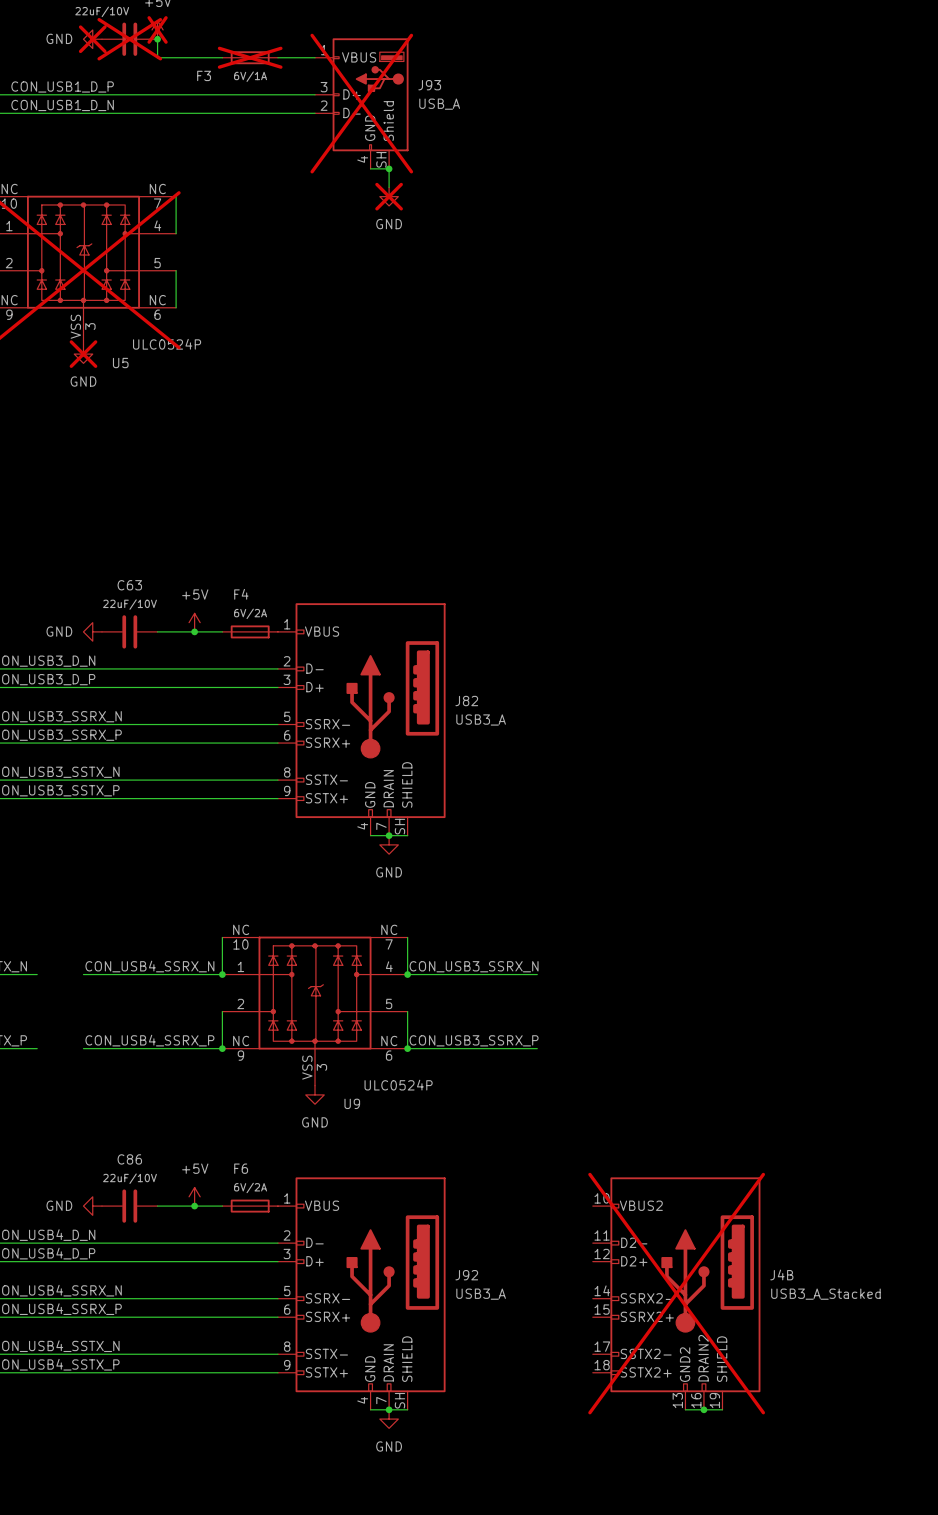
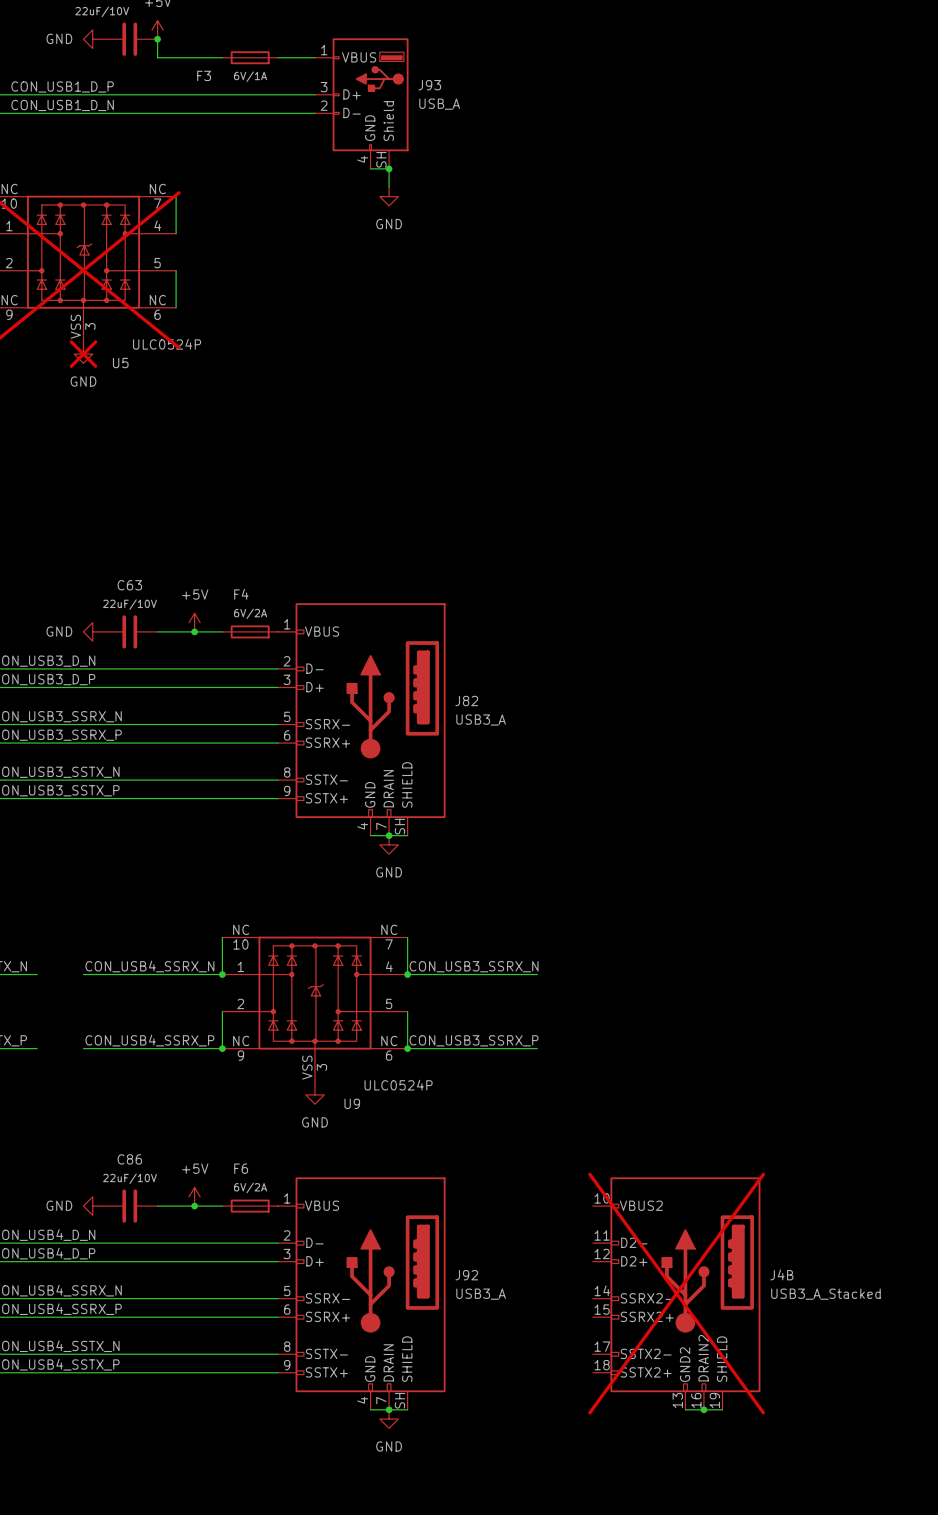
power symbol do-not-place cross: (157, 29) -> none
power symbol do-not-place cross: (92, 39) -> none
part do-not-place cross: (129, 39) -> none
F3 do-not-place cross: (250, 57) -> none
J93 do-not-place cross: (361, 103) -> none
power symbol do-not-place cross: (389, 196) -> none

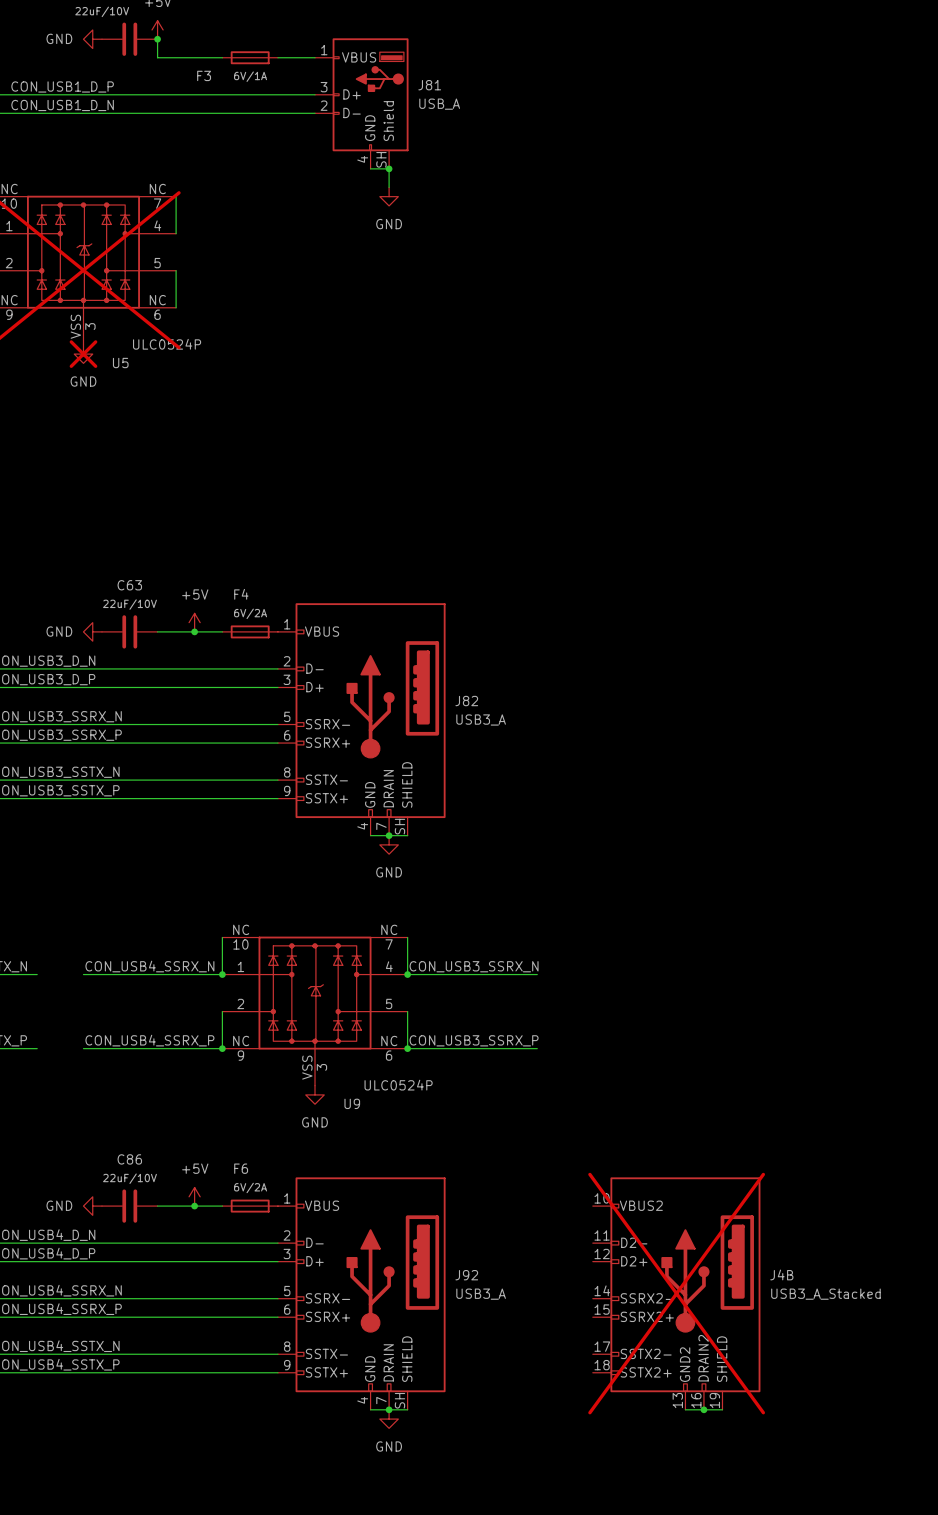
J93 name: J93 (429, 85) -> J81 (429, 85)

